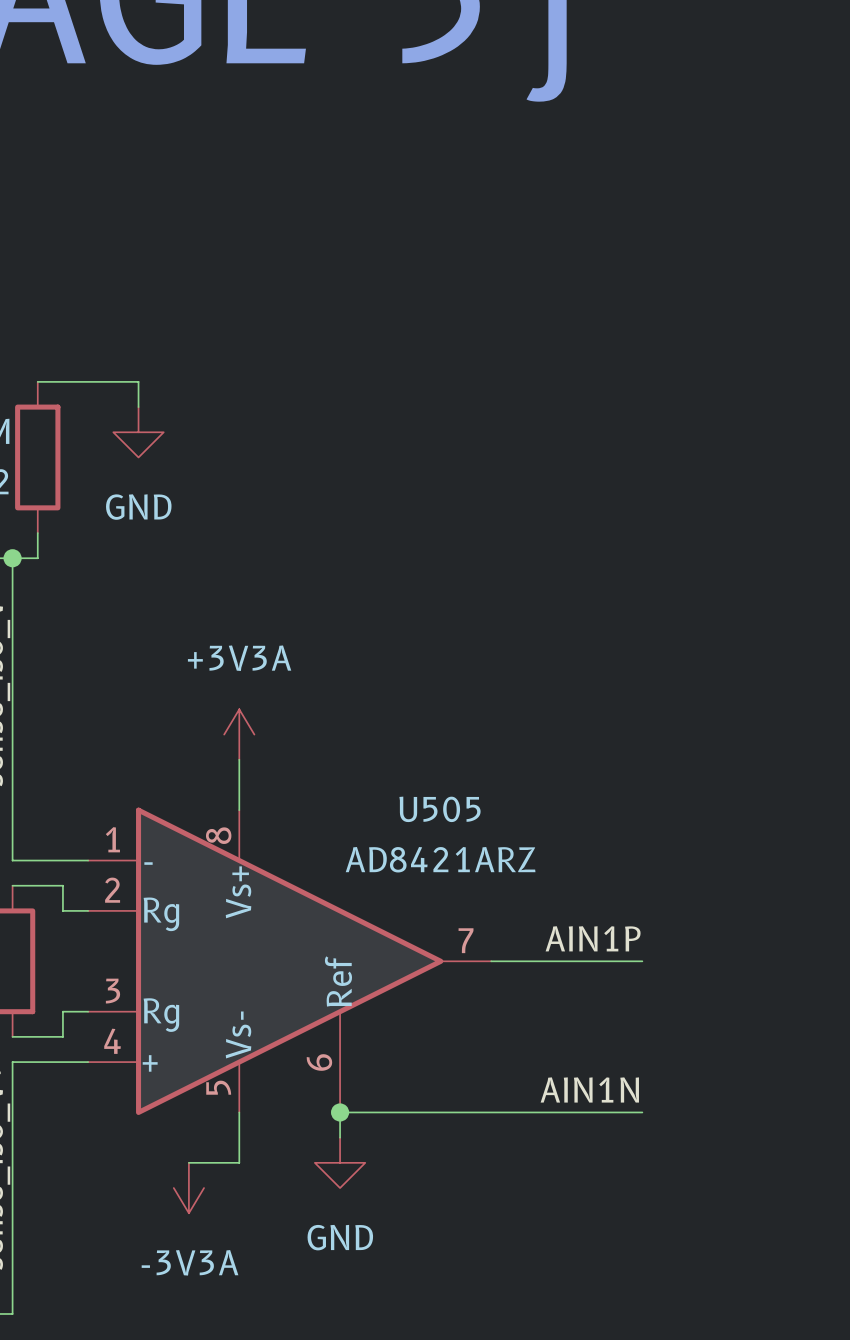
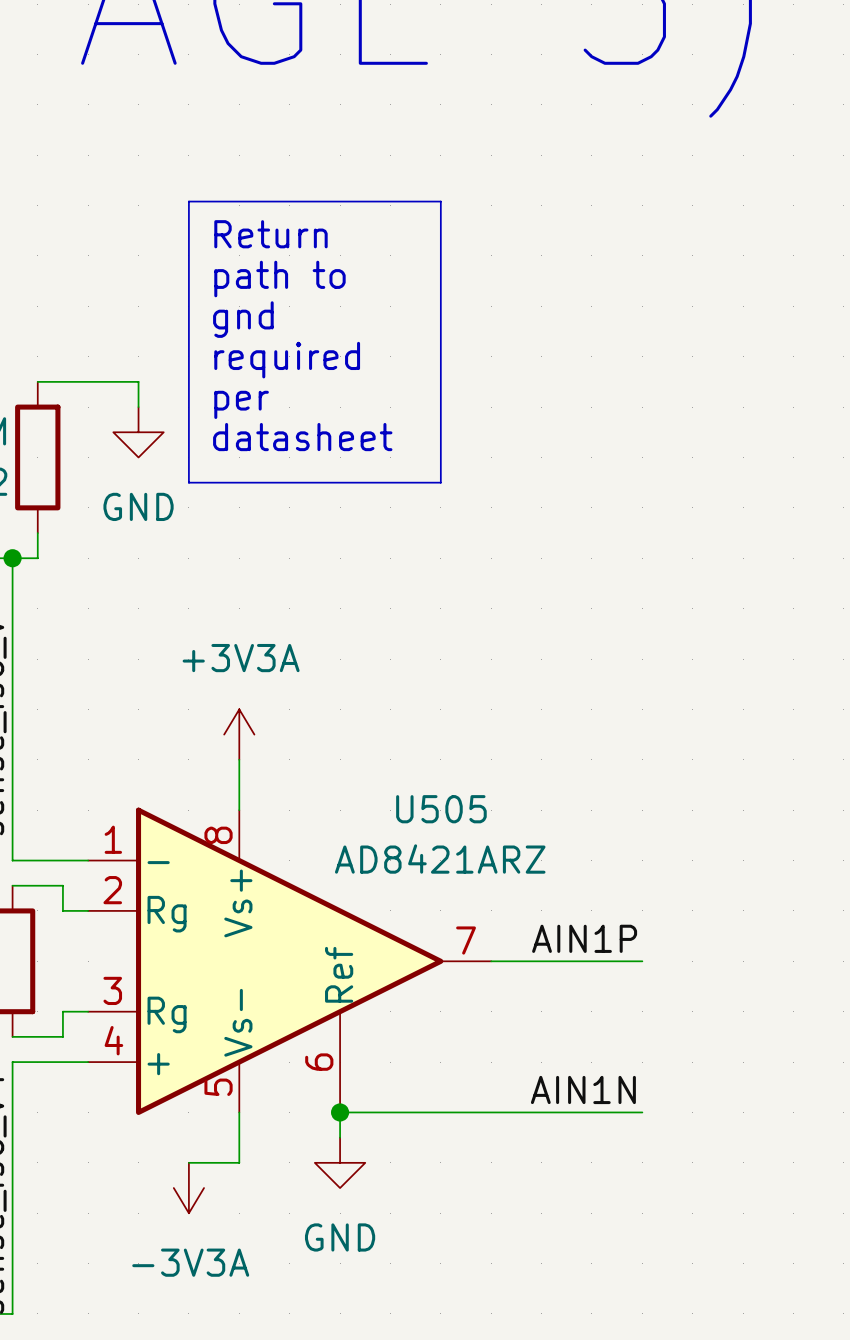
line: none -> (188, 201) (440, 201) (440, 482) (188, 482) (188, 201)
text: none -> Return (270, 234)
text: none -> path to (279, 279)
text: none -> gnd (243, 319)
text: none -> required (287, 360)
text: none -> per (241, 404)
text: none -> datasheet (302, 437)

